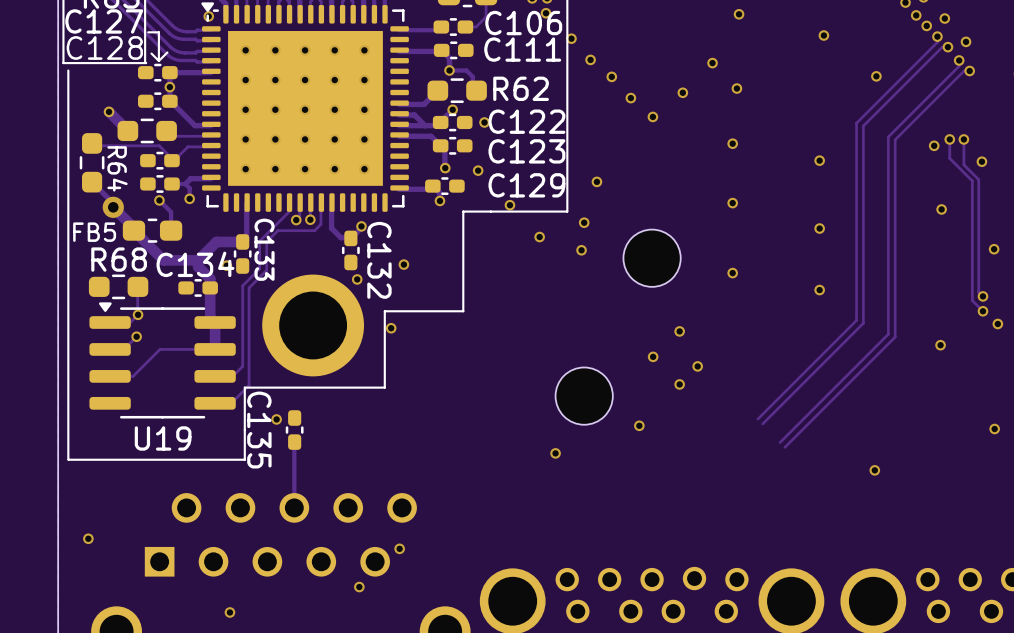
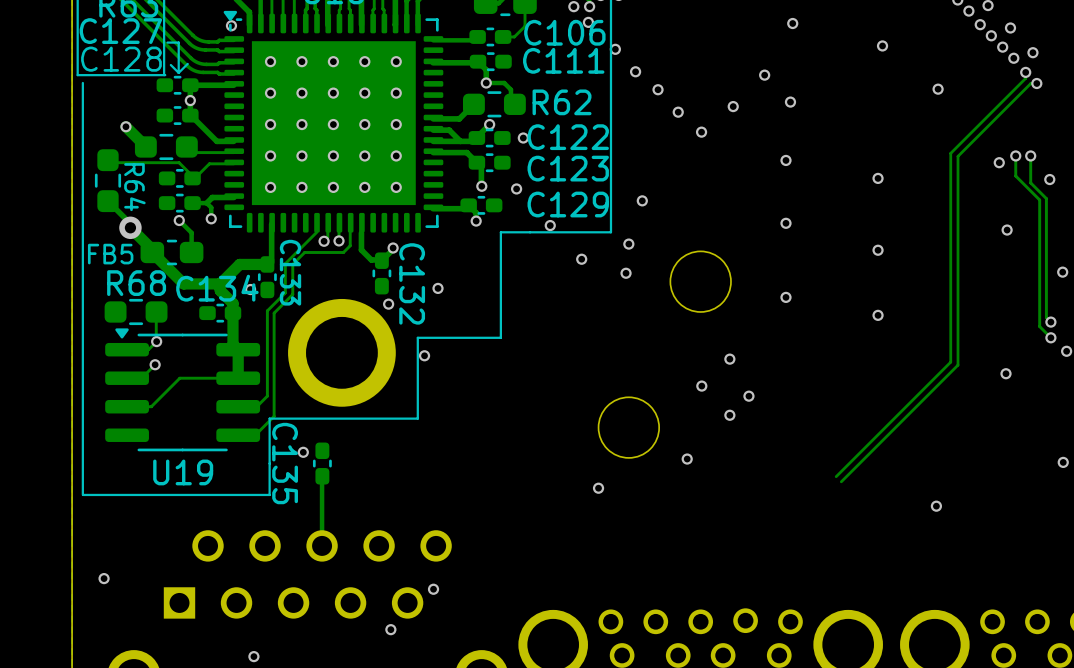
track: (937, 36) (937, 42) (856, 123) (856, 320) (757, 419) -> none
track: (947, 47) (942, 47) (863, 126) (863, 323) (762, 423) -> none

